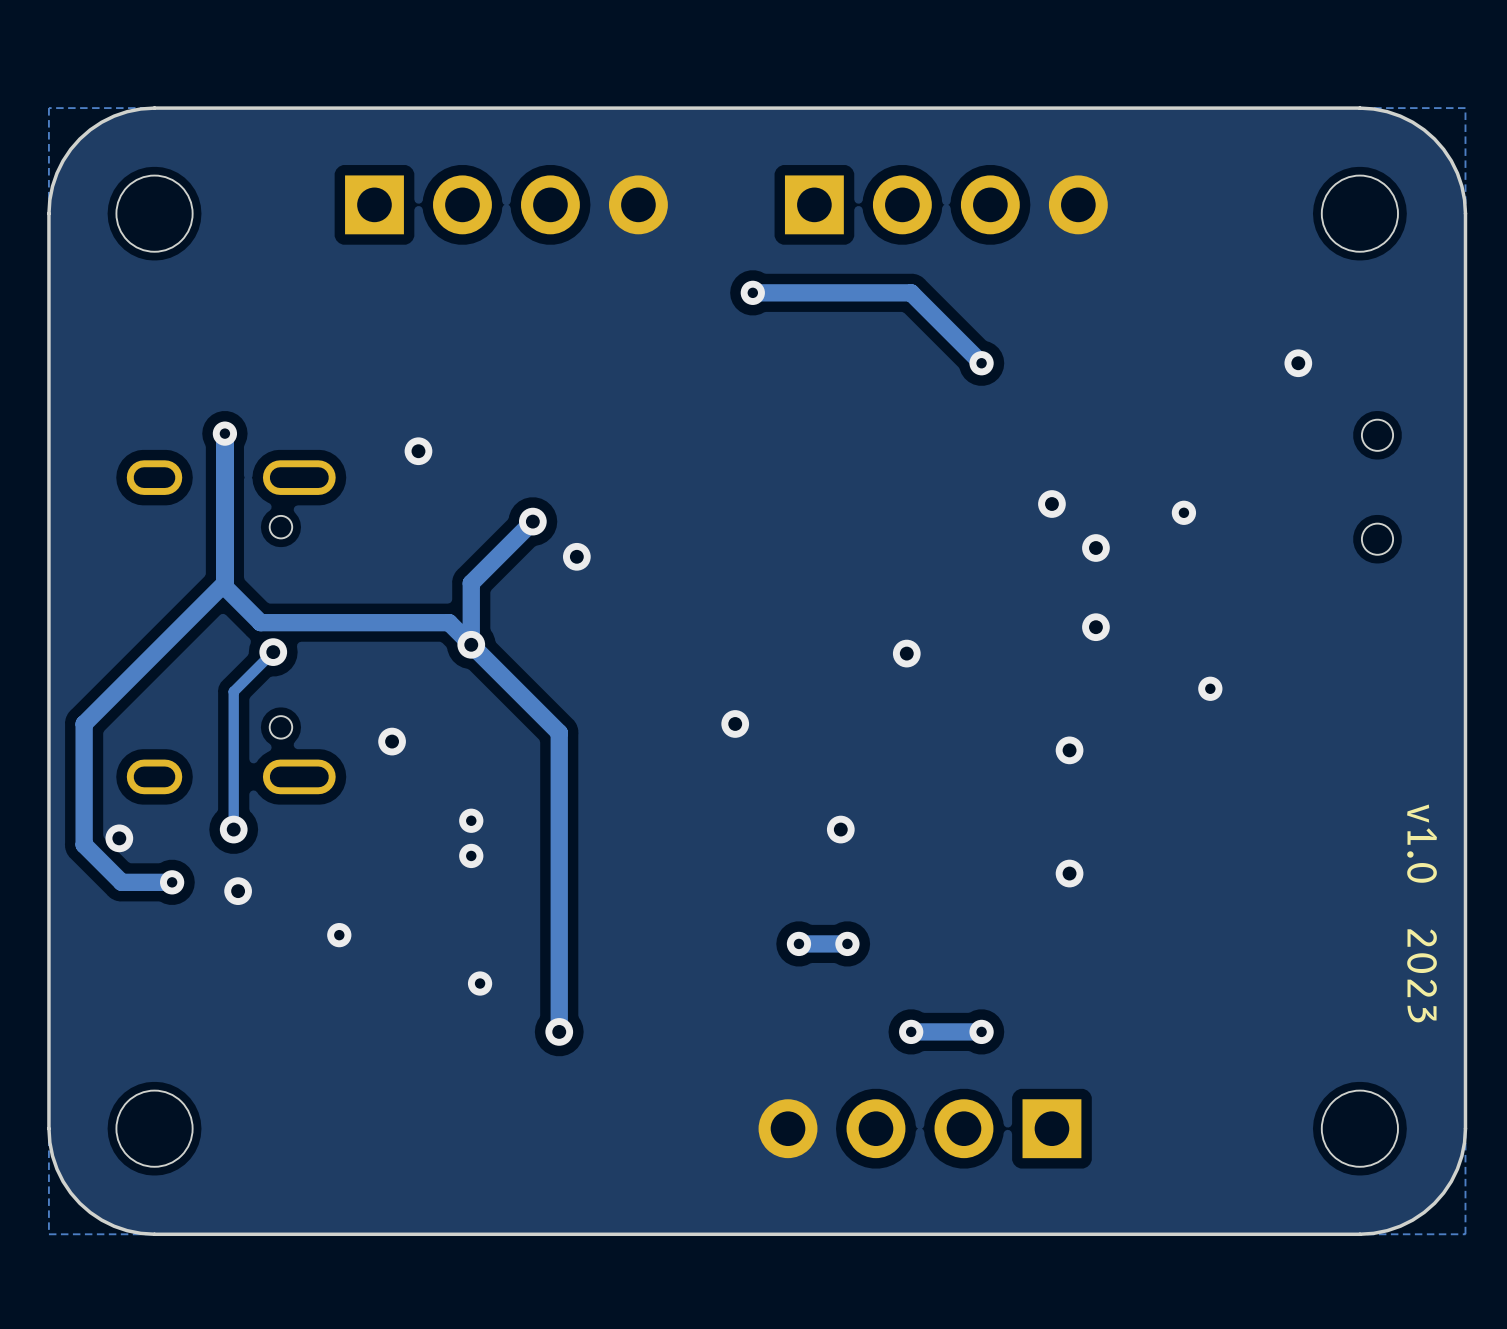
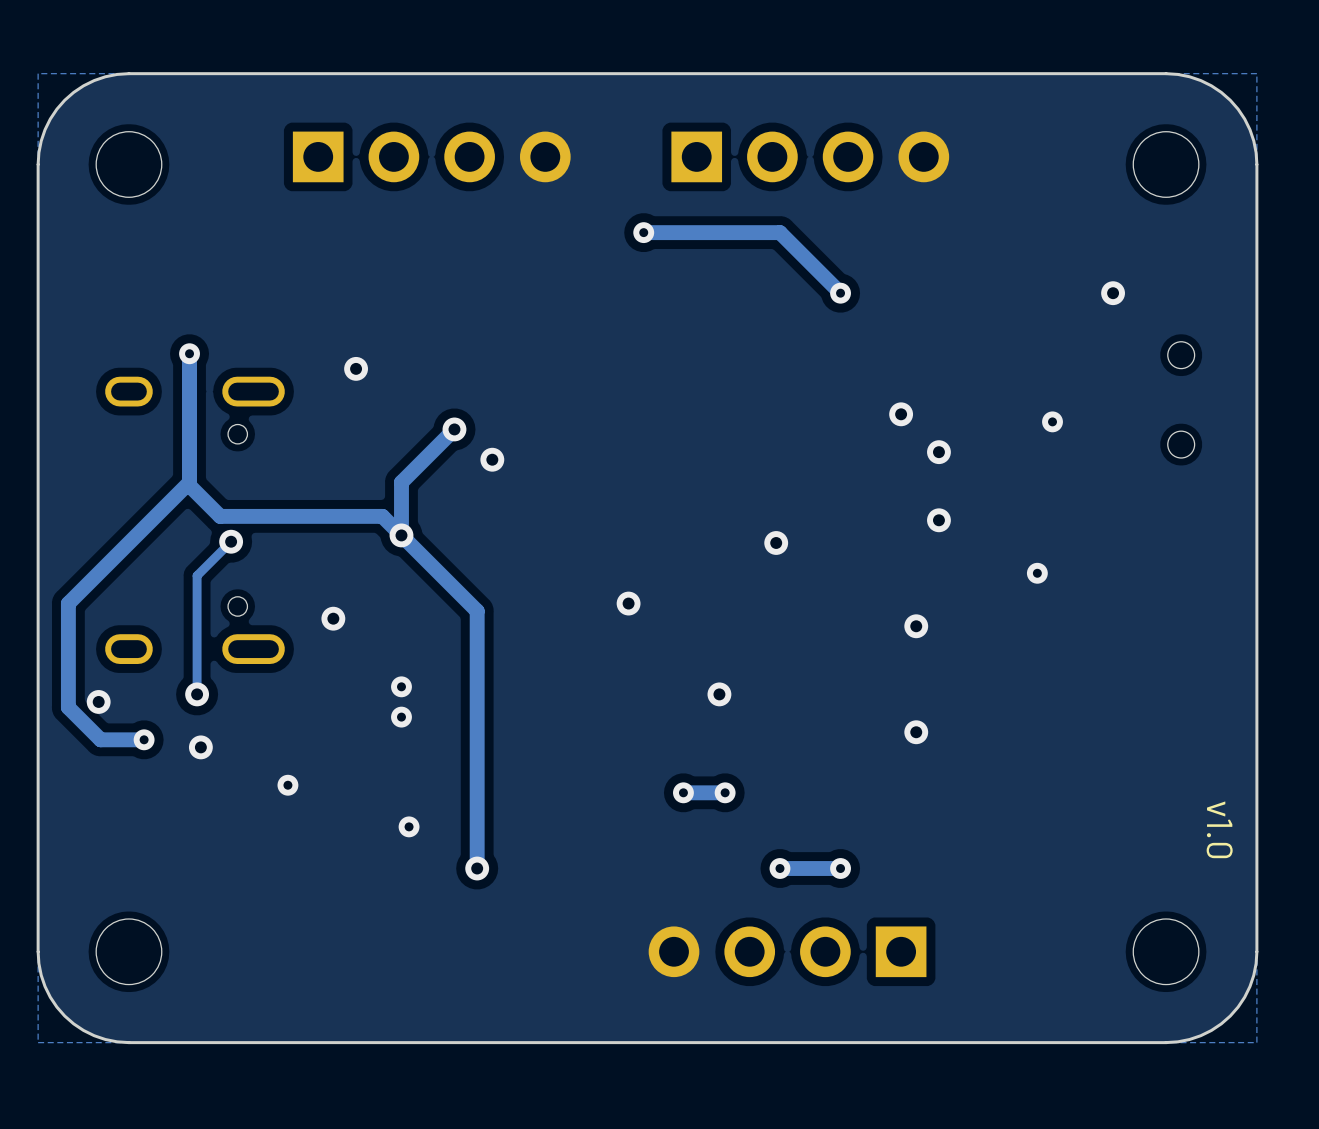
via position: (1183, 512) -> (1052, 421)
text: v1.0 (1422, 843) -> none
text: 2023 (1422, 975) -> v1.0 (1219, 829)

